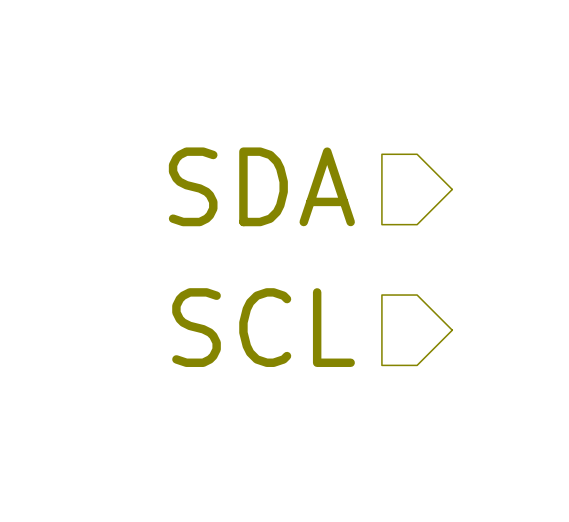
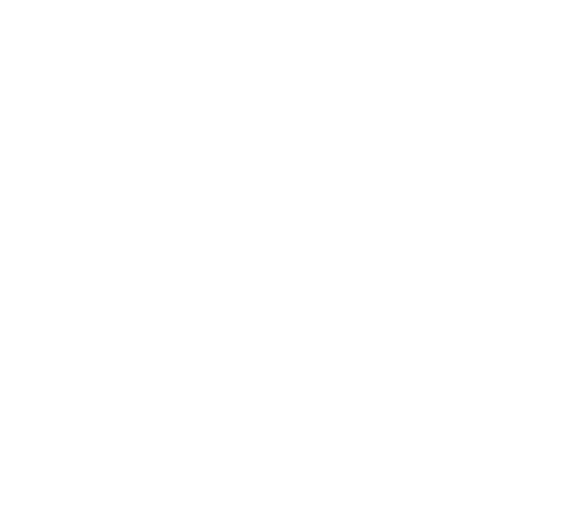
hierarchical label: SDA (261, 186) -> none
hierarchical label: SCL (263, 327) -> none

